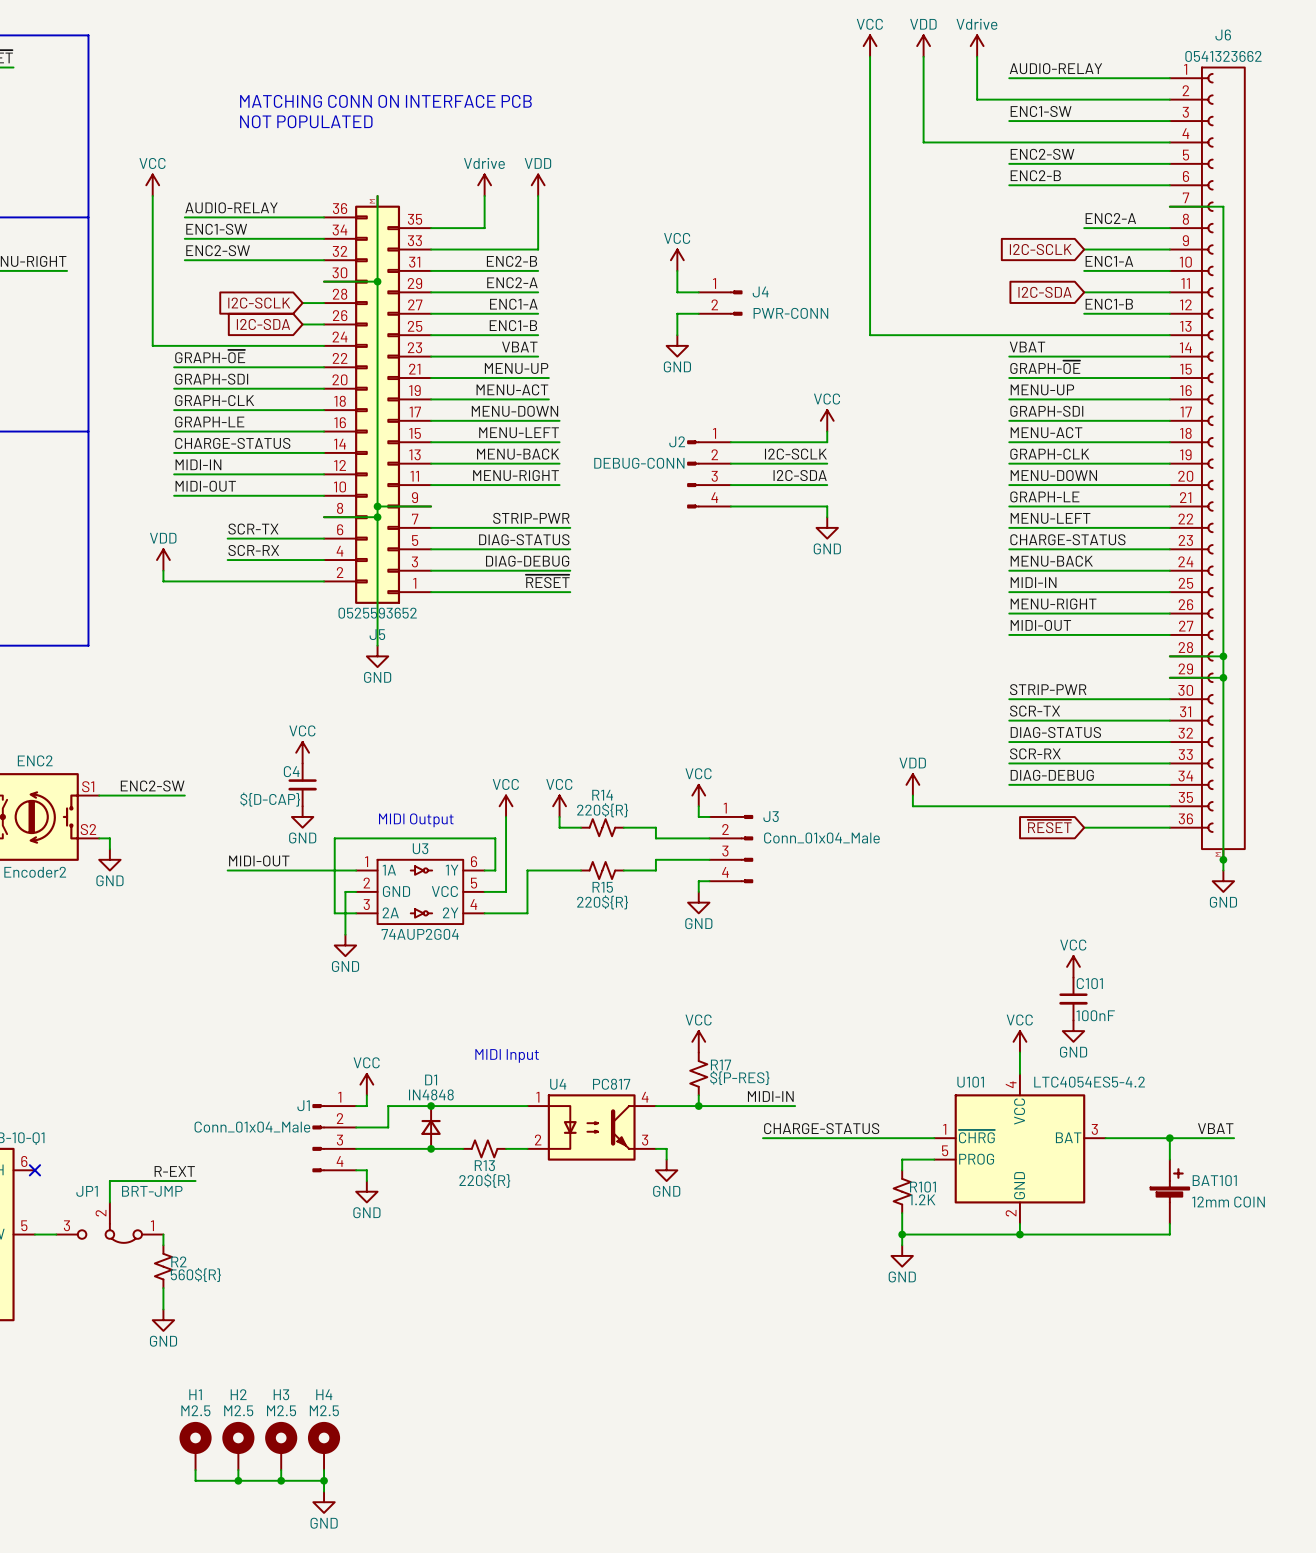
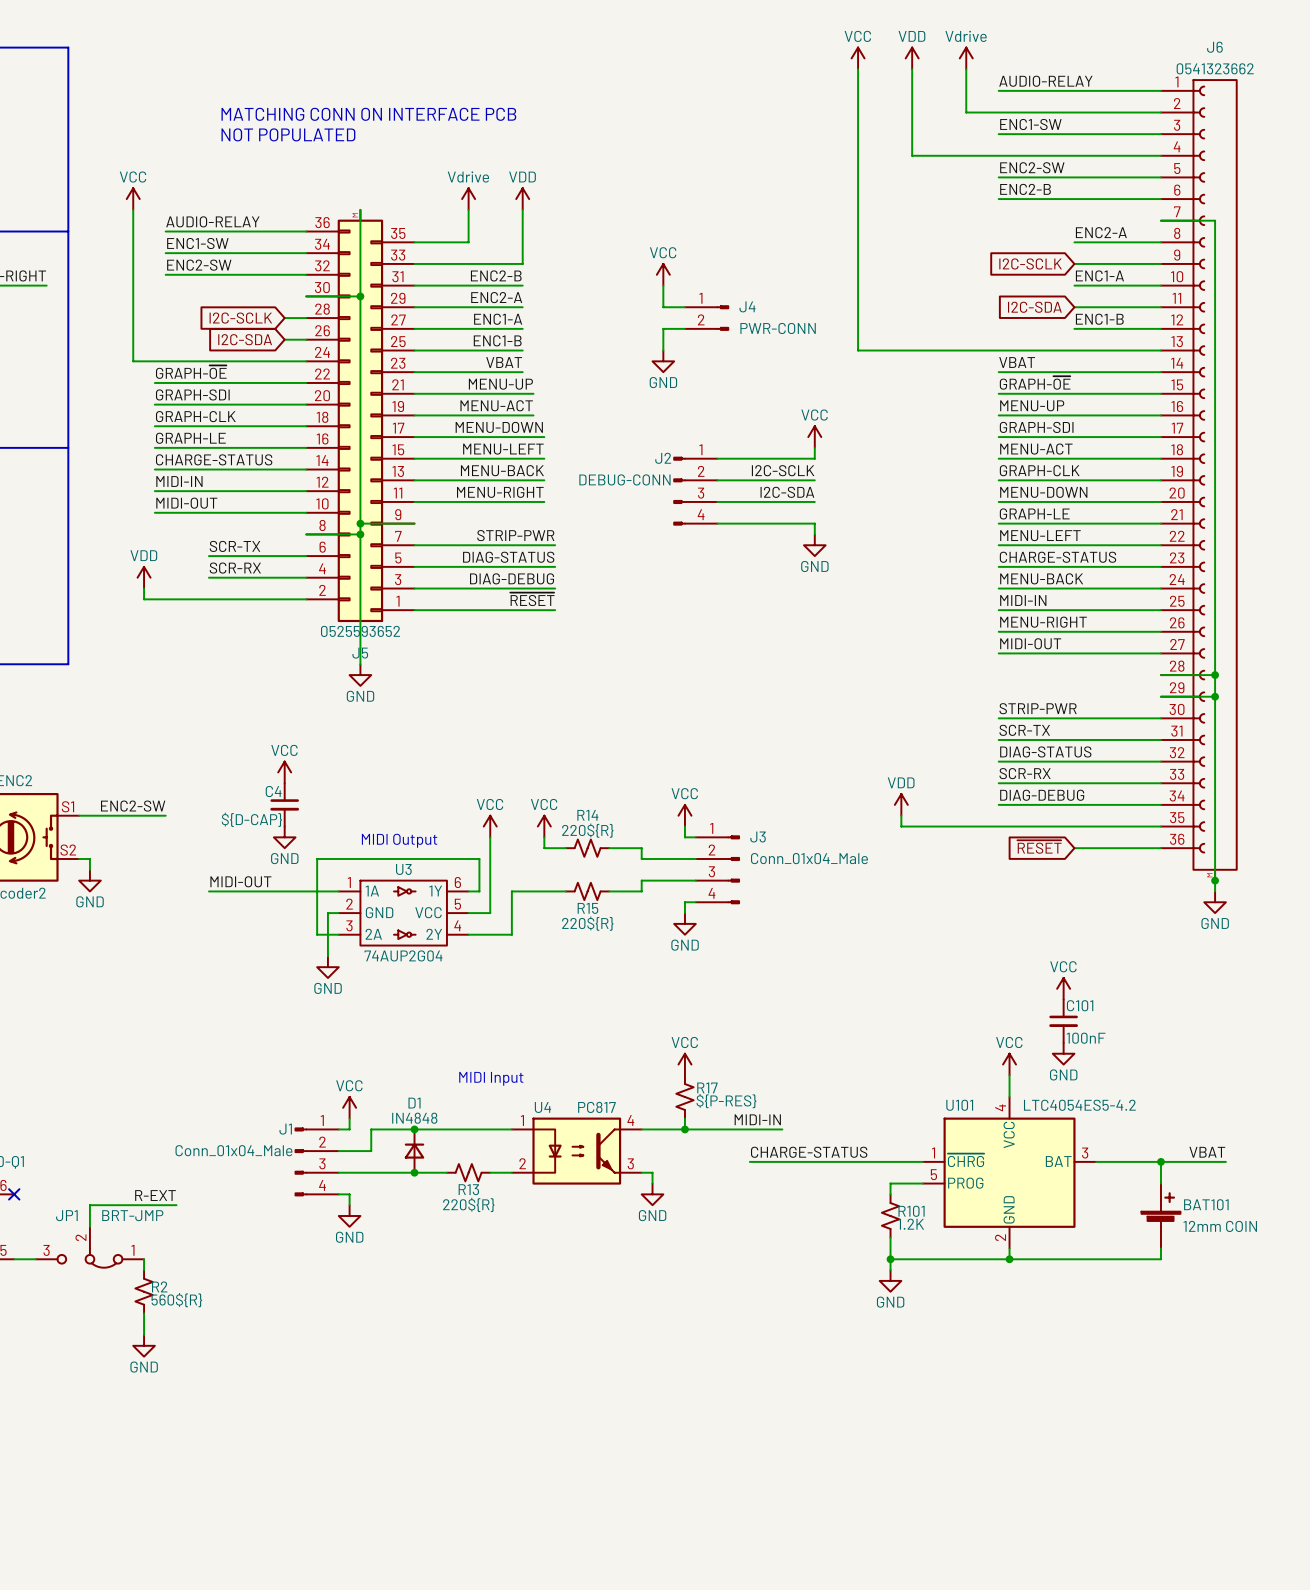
H1: M2.5 (195, 1445) -> none
H2: M2.5 (238, 1445) -> none
H3: M2.5 (281, 1445) -> none
H4: M2.5 (324, 1445) -> none
wire: (195, 1470) (195, 1480) (324, 1480) -> none
wire: (238, 1470) (238, 1480) -> none
wire: (281, 1470) (281, 1480) -> none
wire: (324, 1470) (324, 1491) -> none
junction: (238, 1480) -> none
junction: (281, 1480) -> none
junction: (324, 1480) -> none
power symbol: GND (324, 1502) -> none

